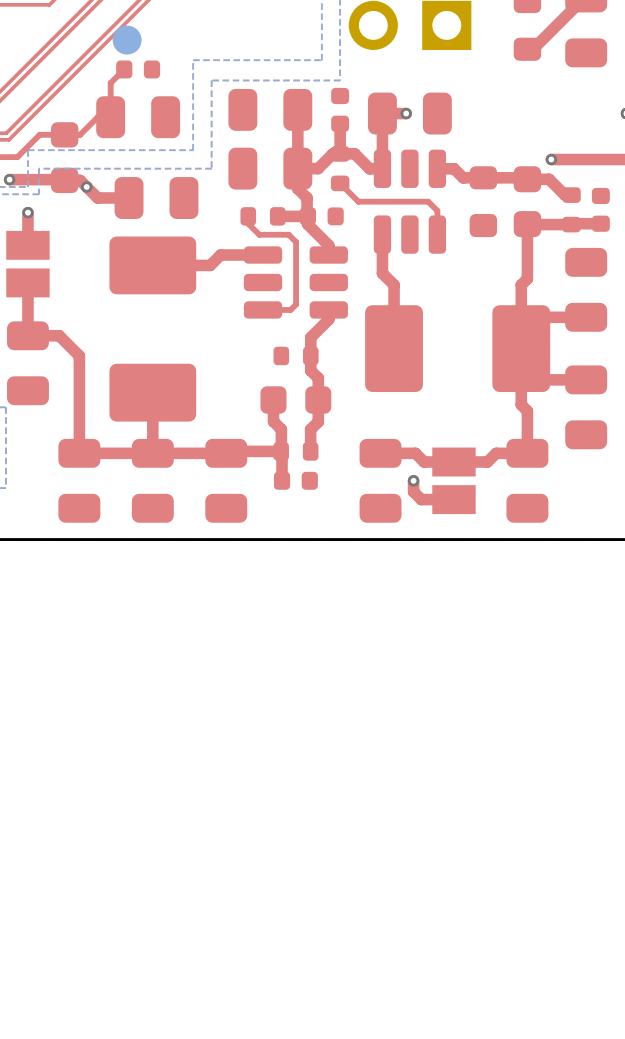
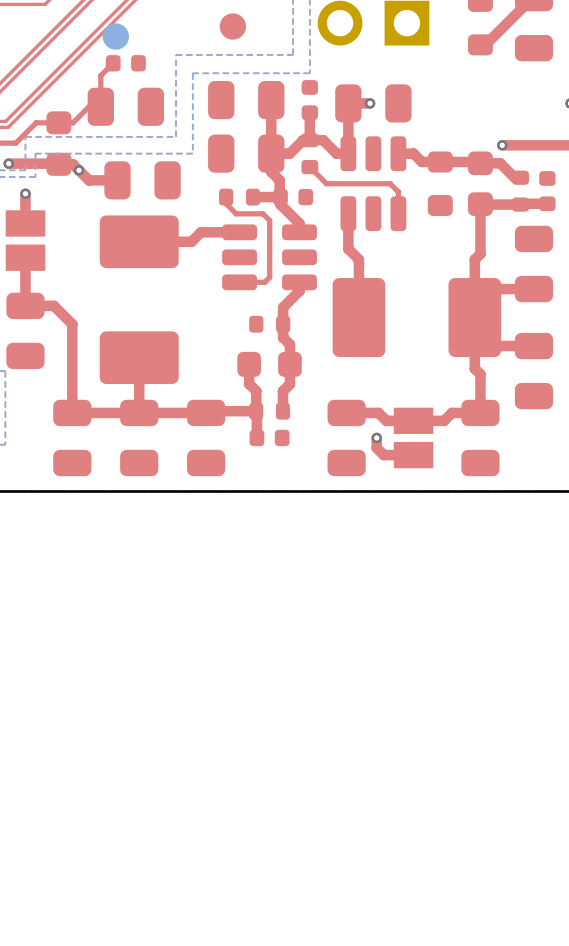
part: none -> (232, 26)

